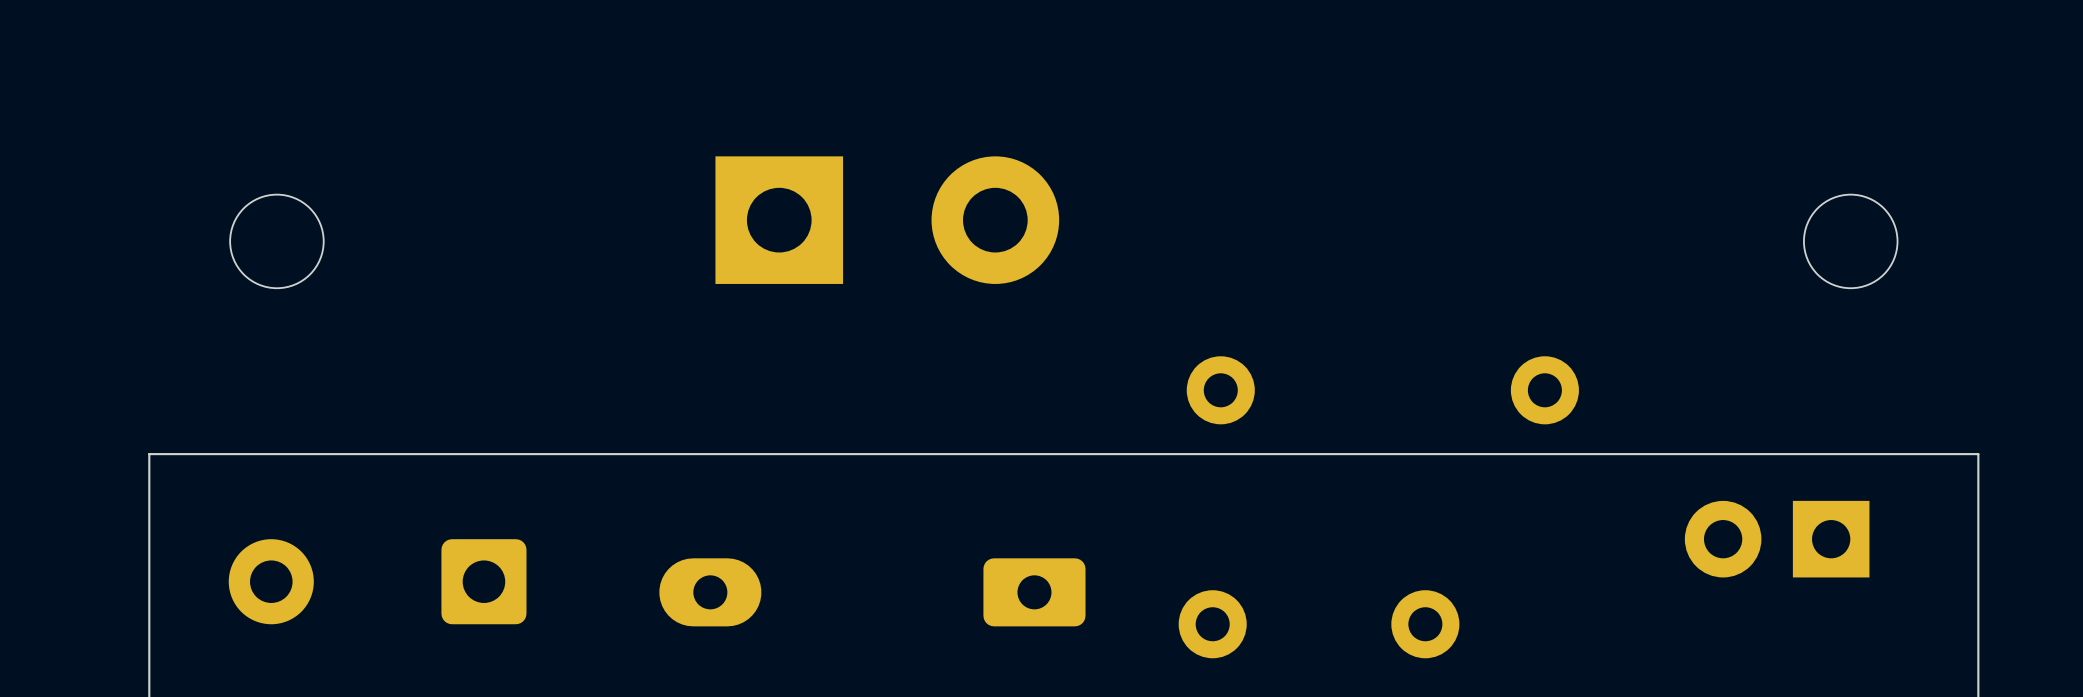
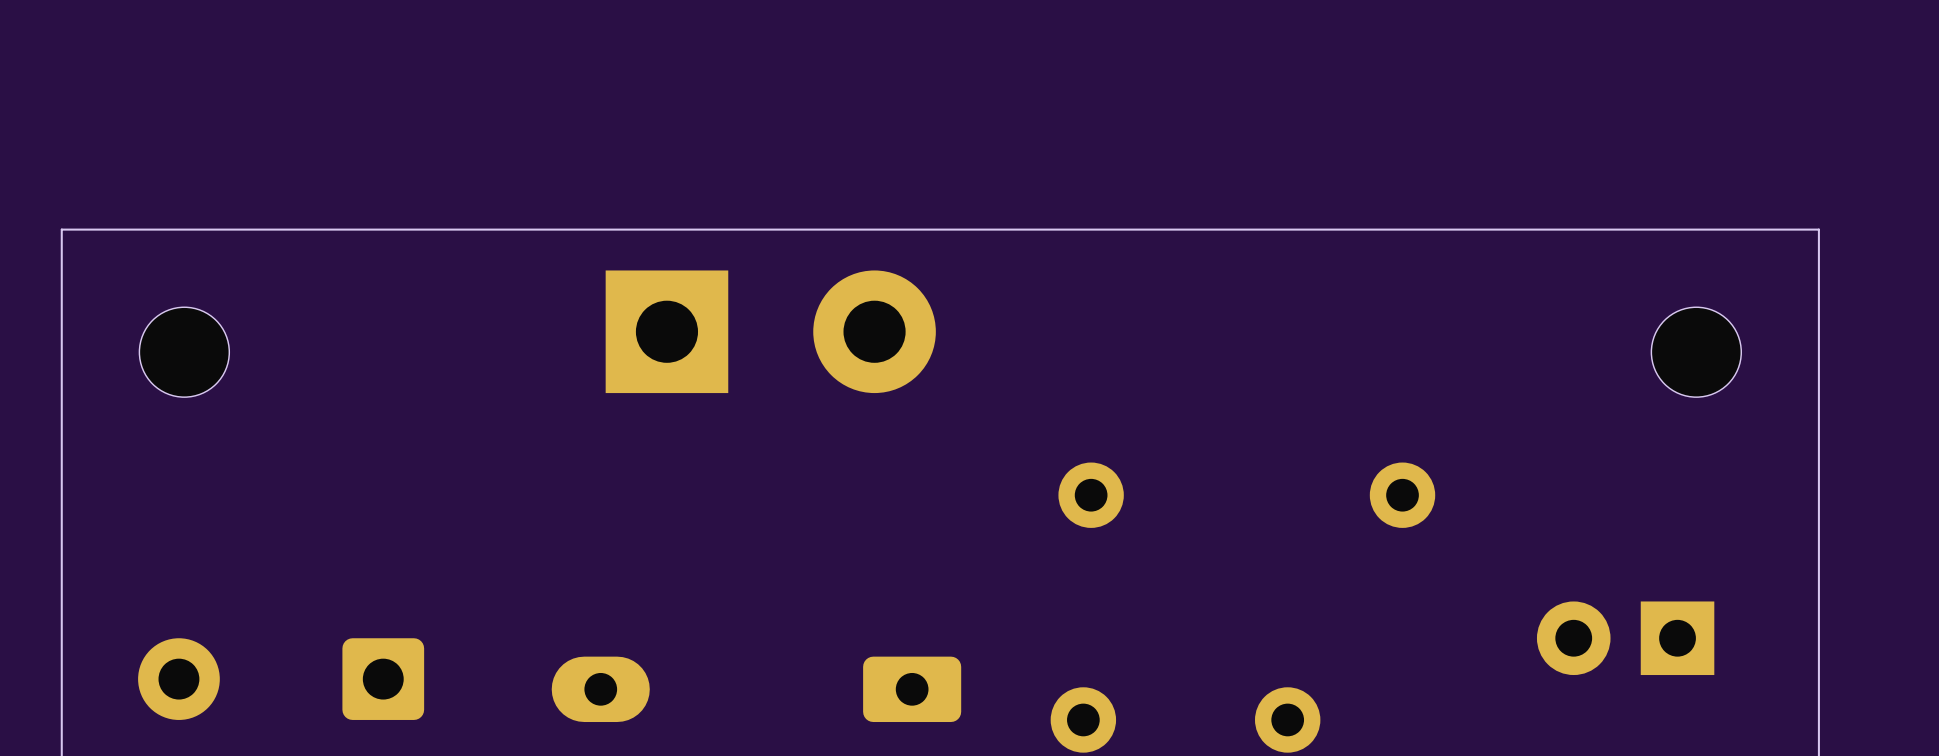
board edge: (1978, 454) (149, 454) -> (1818, 556) (1818, 229) (61, 229) (61, 556)

